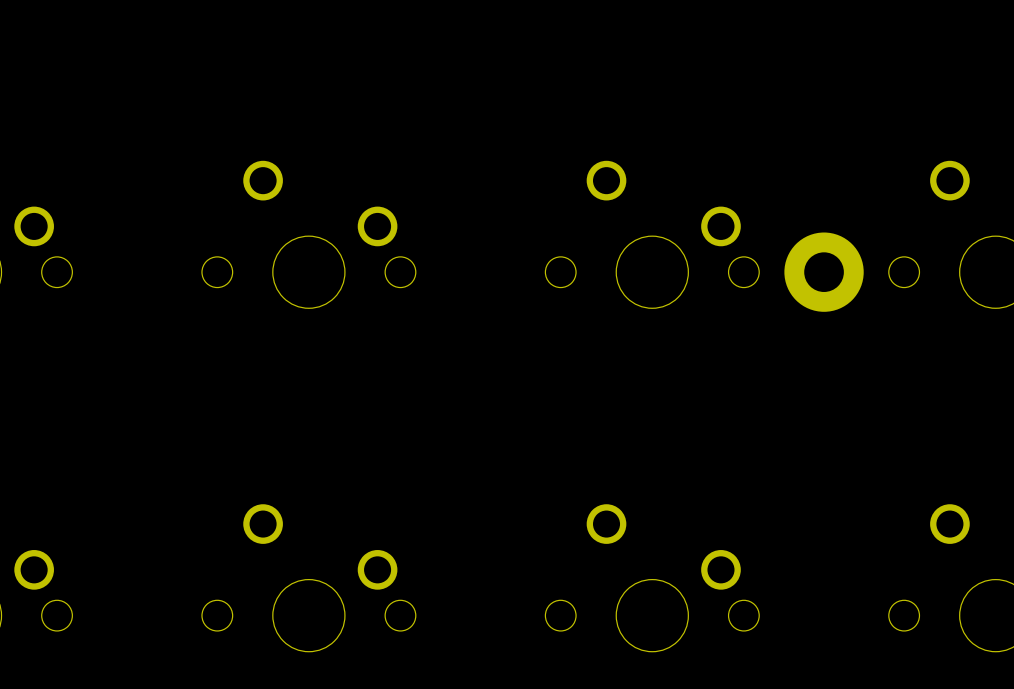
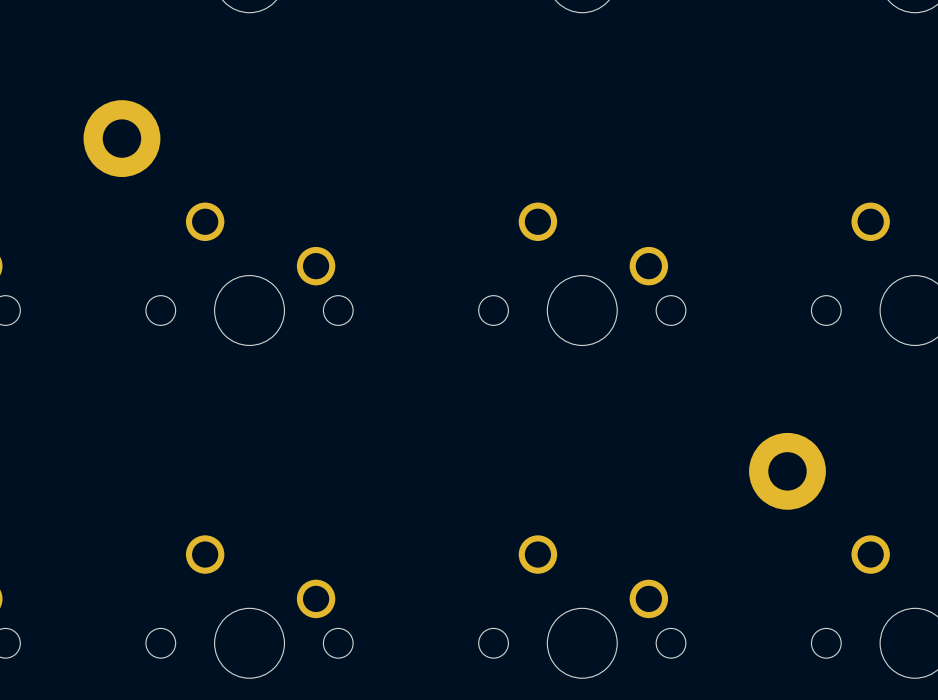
part: none -> (121, 138)
part position: (824, 272) -> (787, 471)

